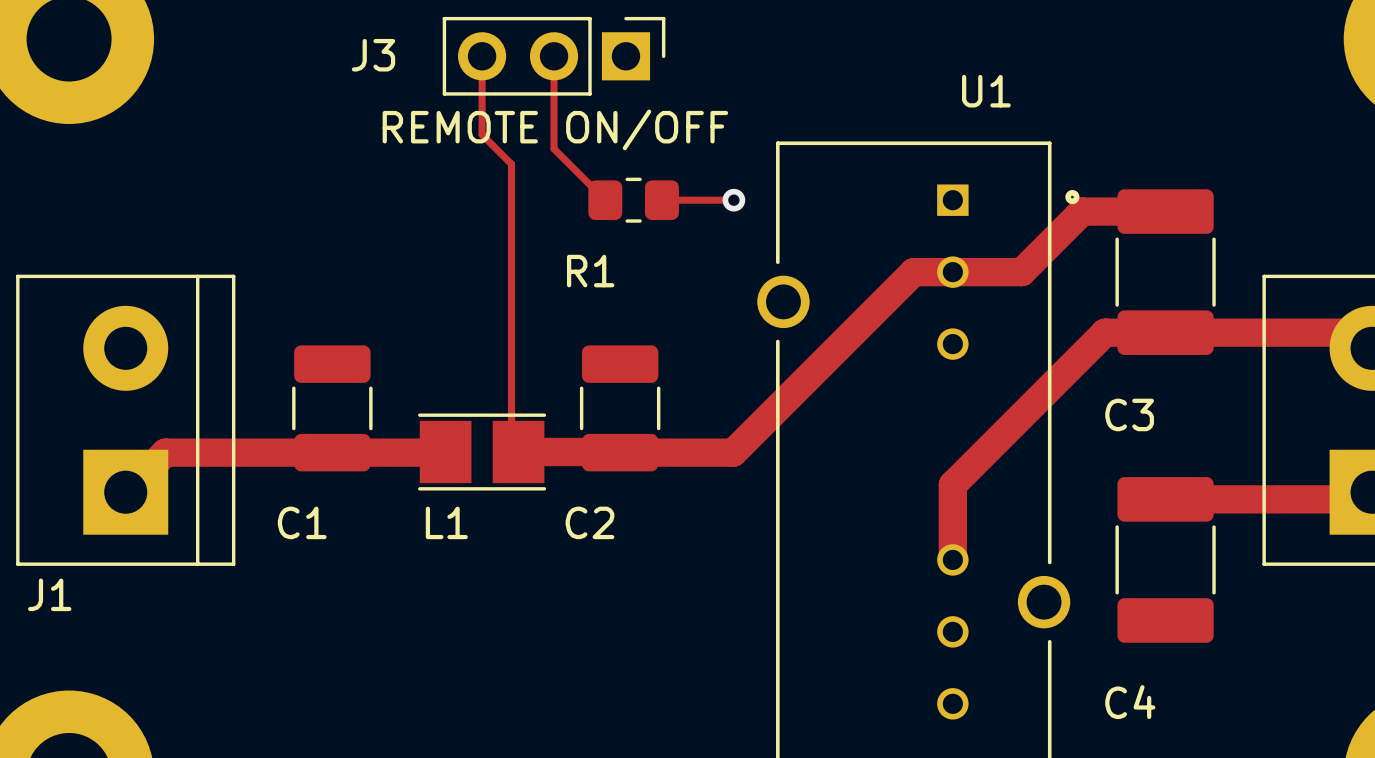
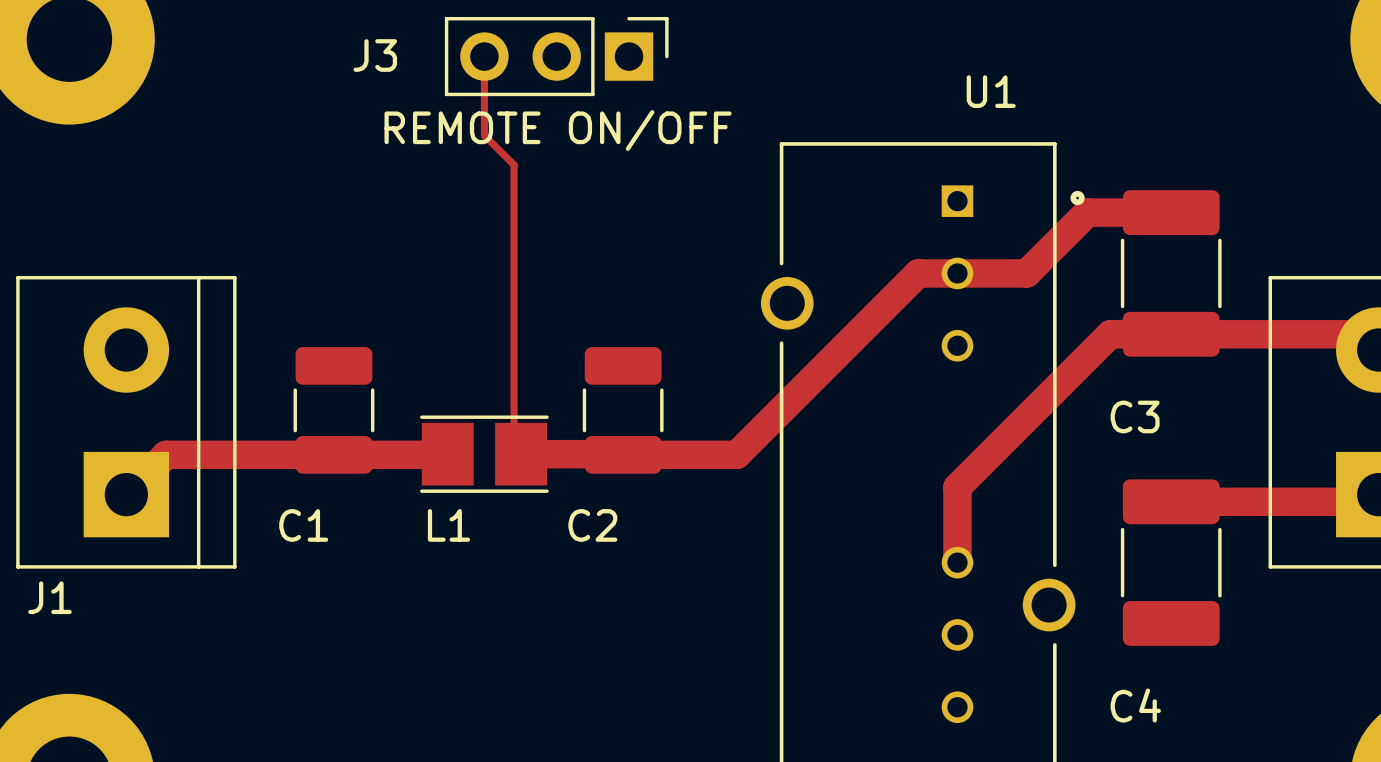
track: (554, 56) (554, 148) (605, 200) -> none
R1: (633, 200) -> none
track: (661, 200) (733, 200) -> none
via: (733, 200) -> none

